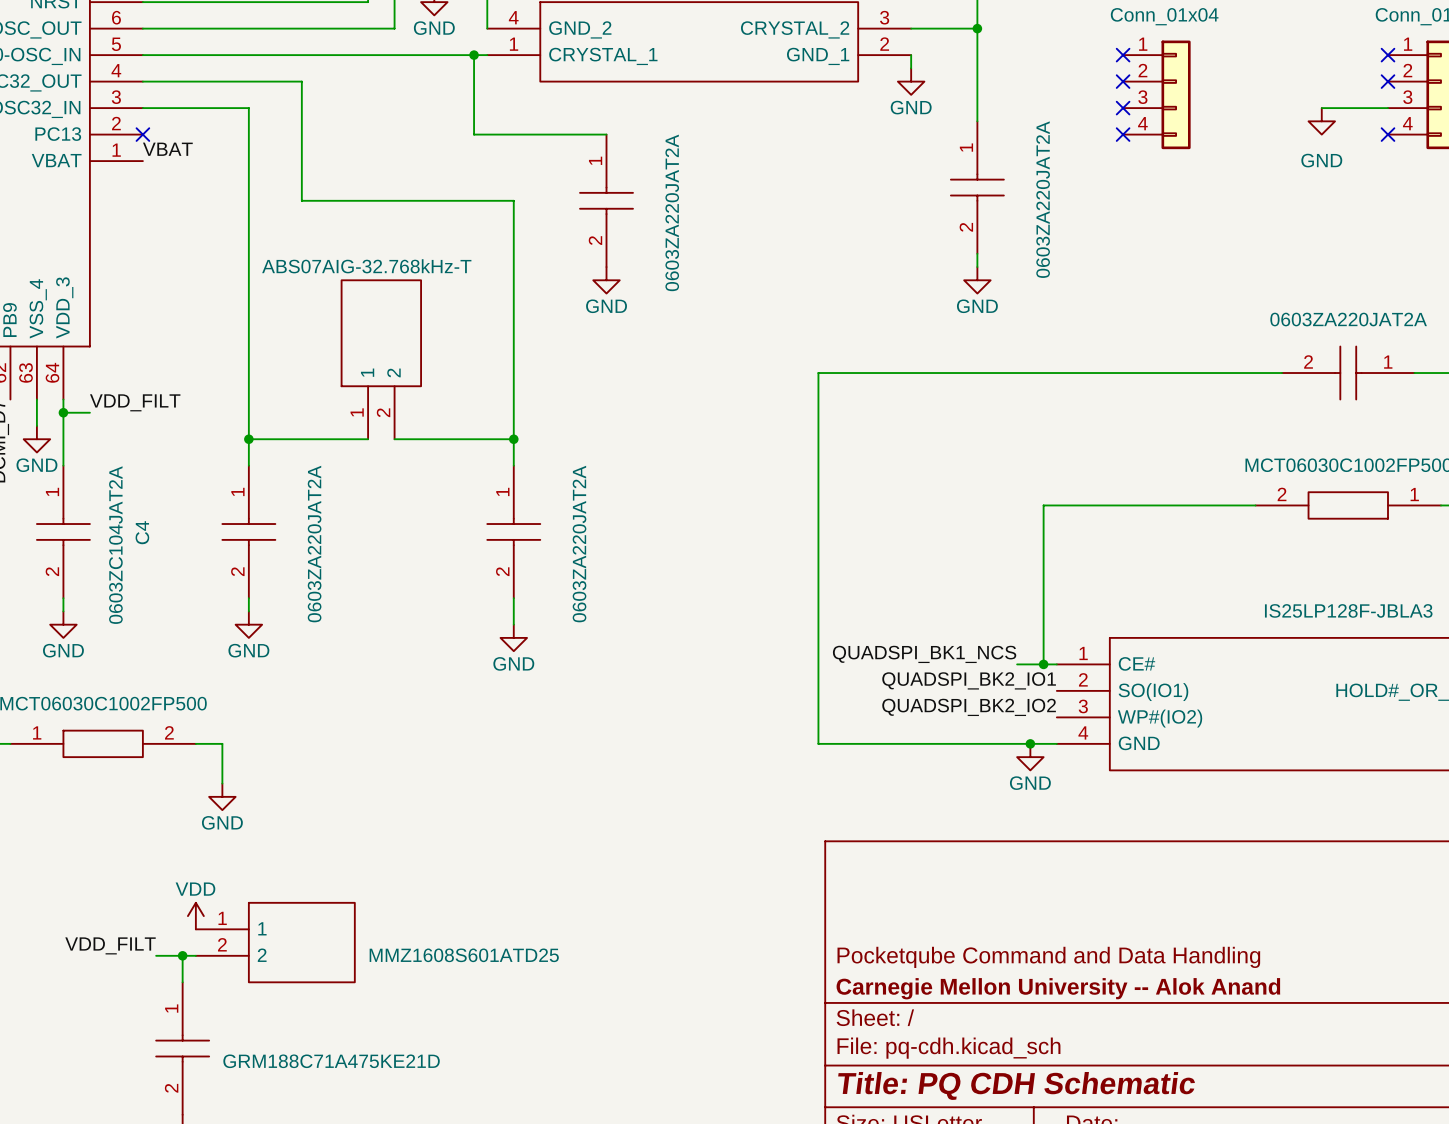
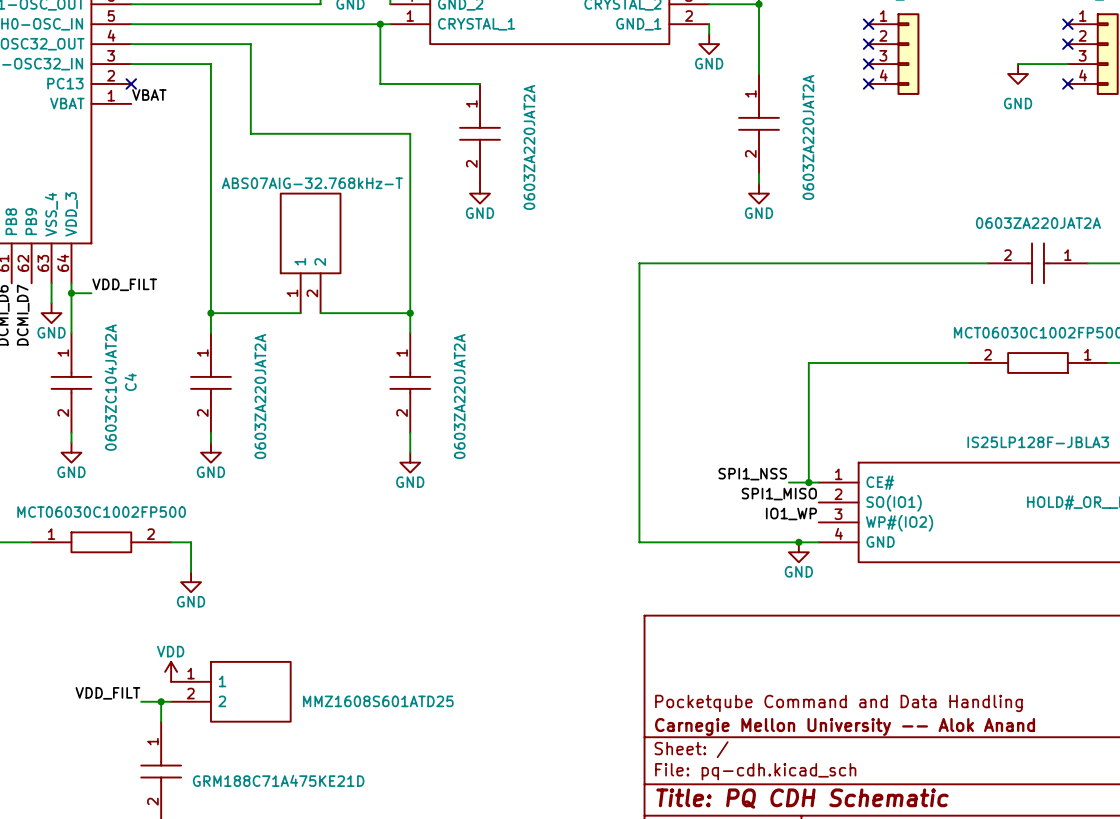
label: QUADSPI_BK1_NCS (924, 654) -> SPI1_NSS (752, 474)
label: QUADSPI_BK2_IO1 (969, 680) -> SPI1_MISO (779, 494)
label: QUADSPI_BK2_IO2 (969, 707) -> IO1_WP (791, 513)

